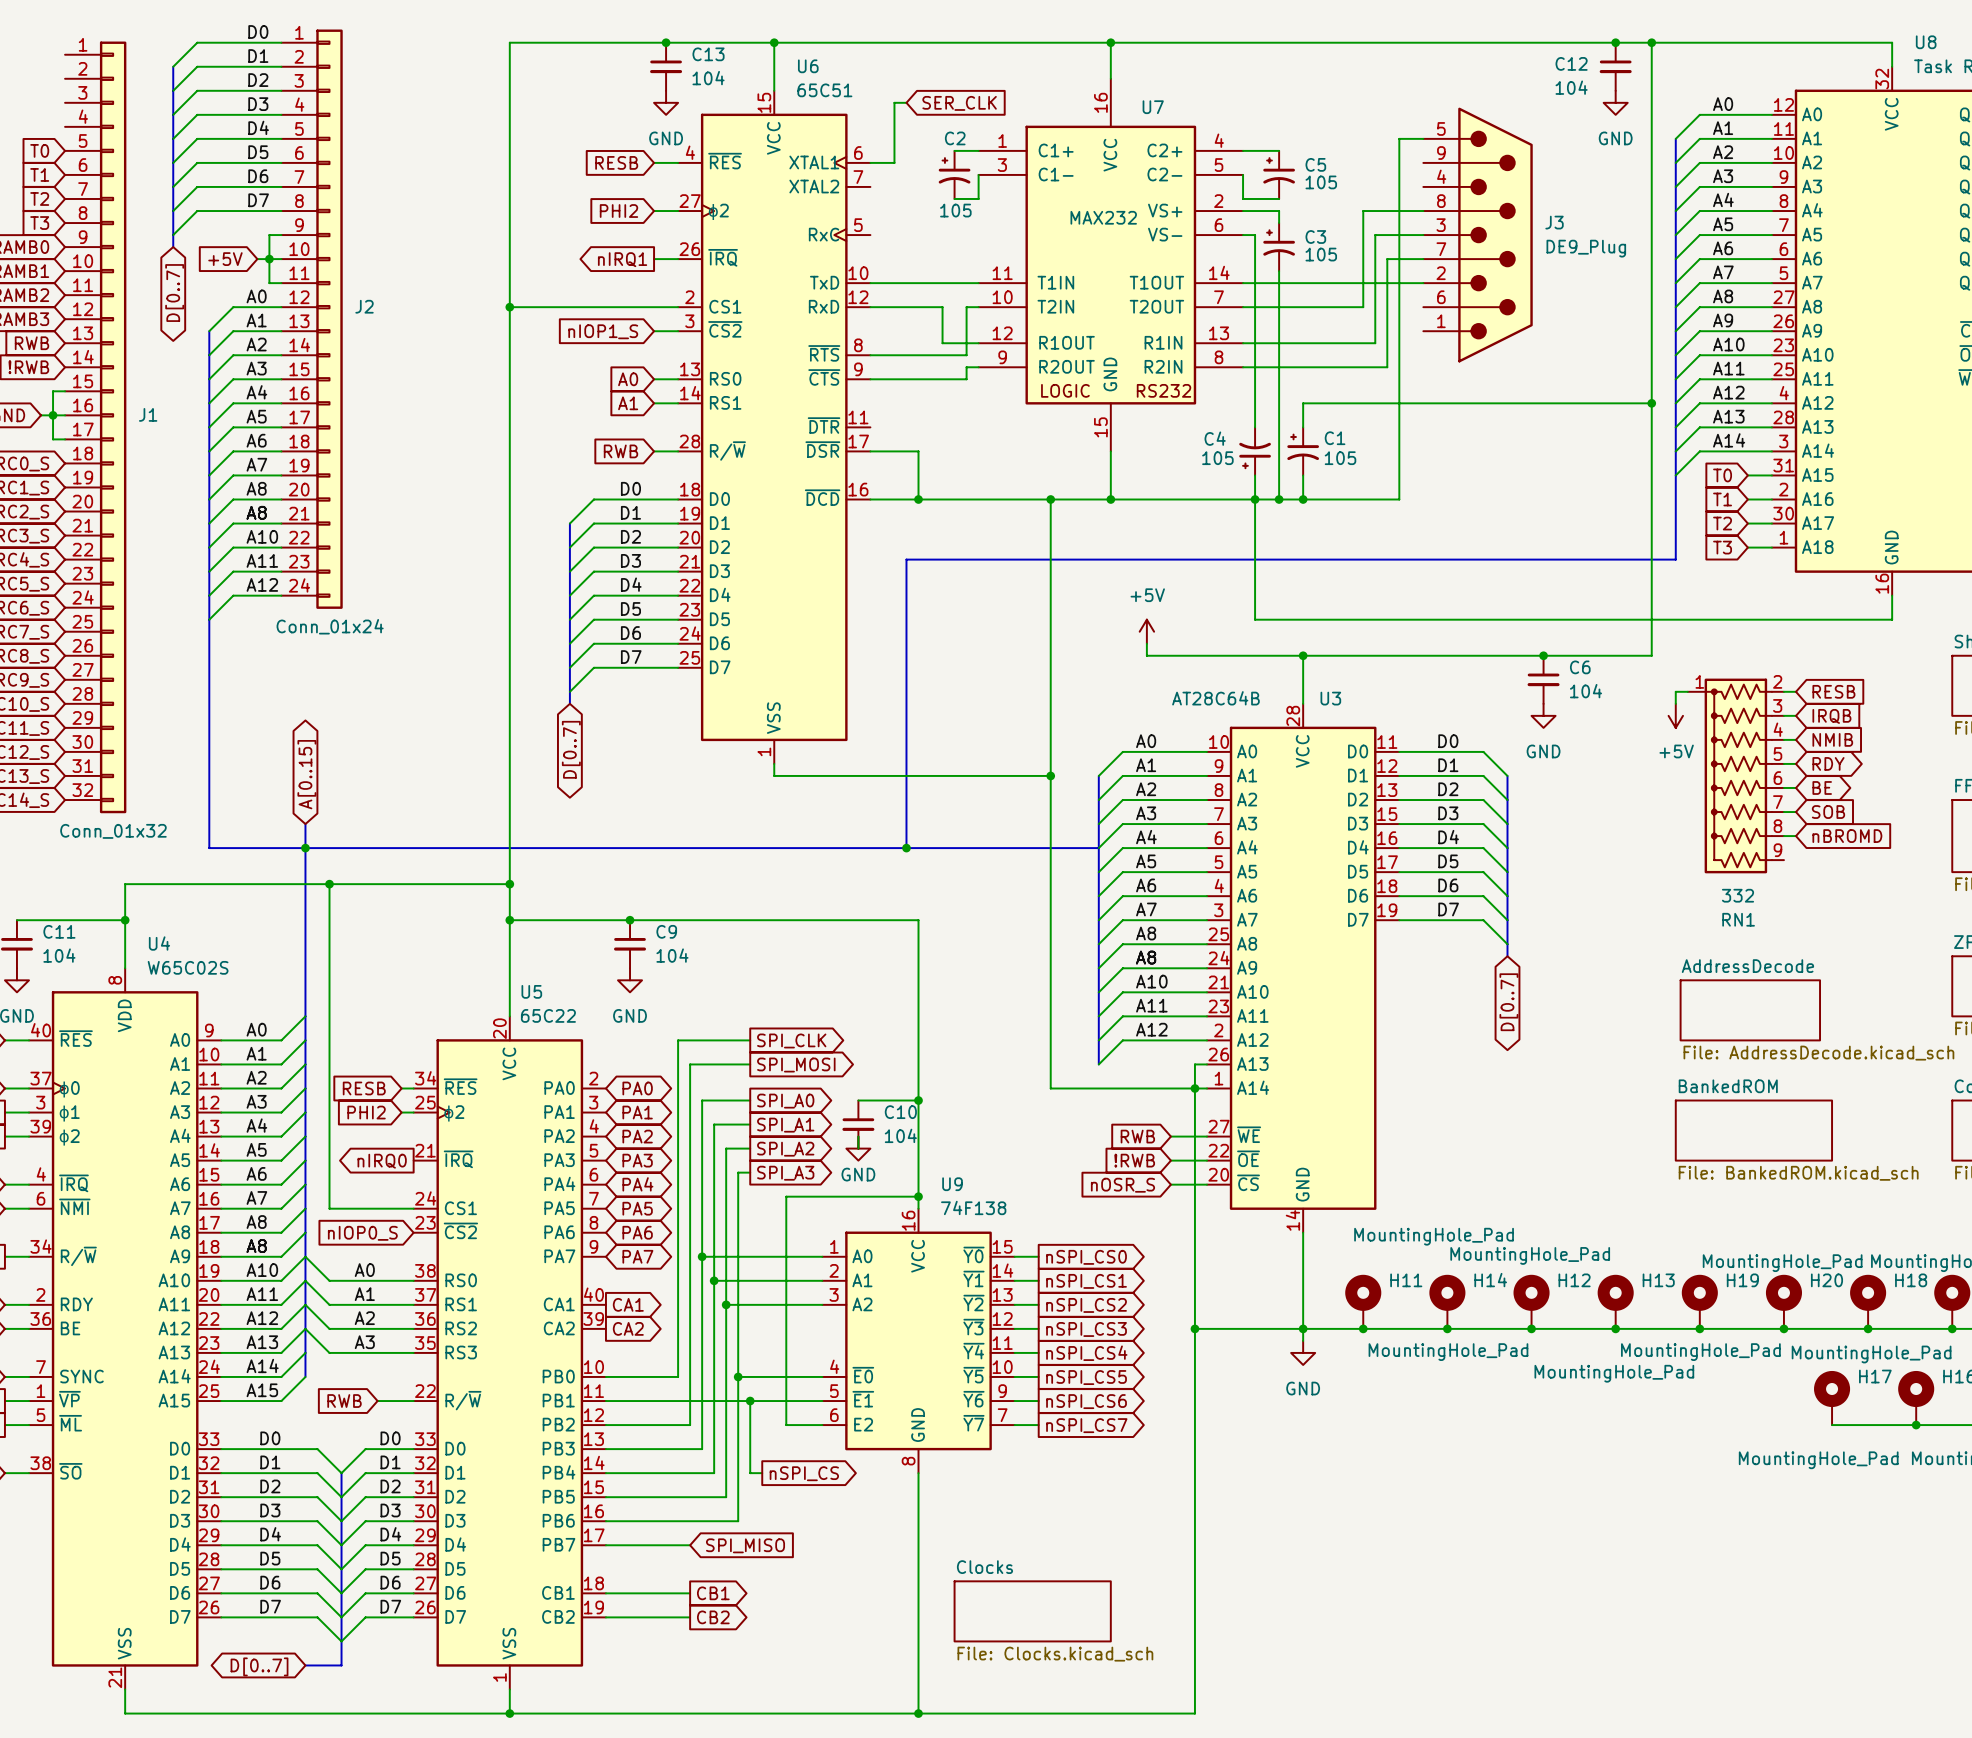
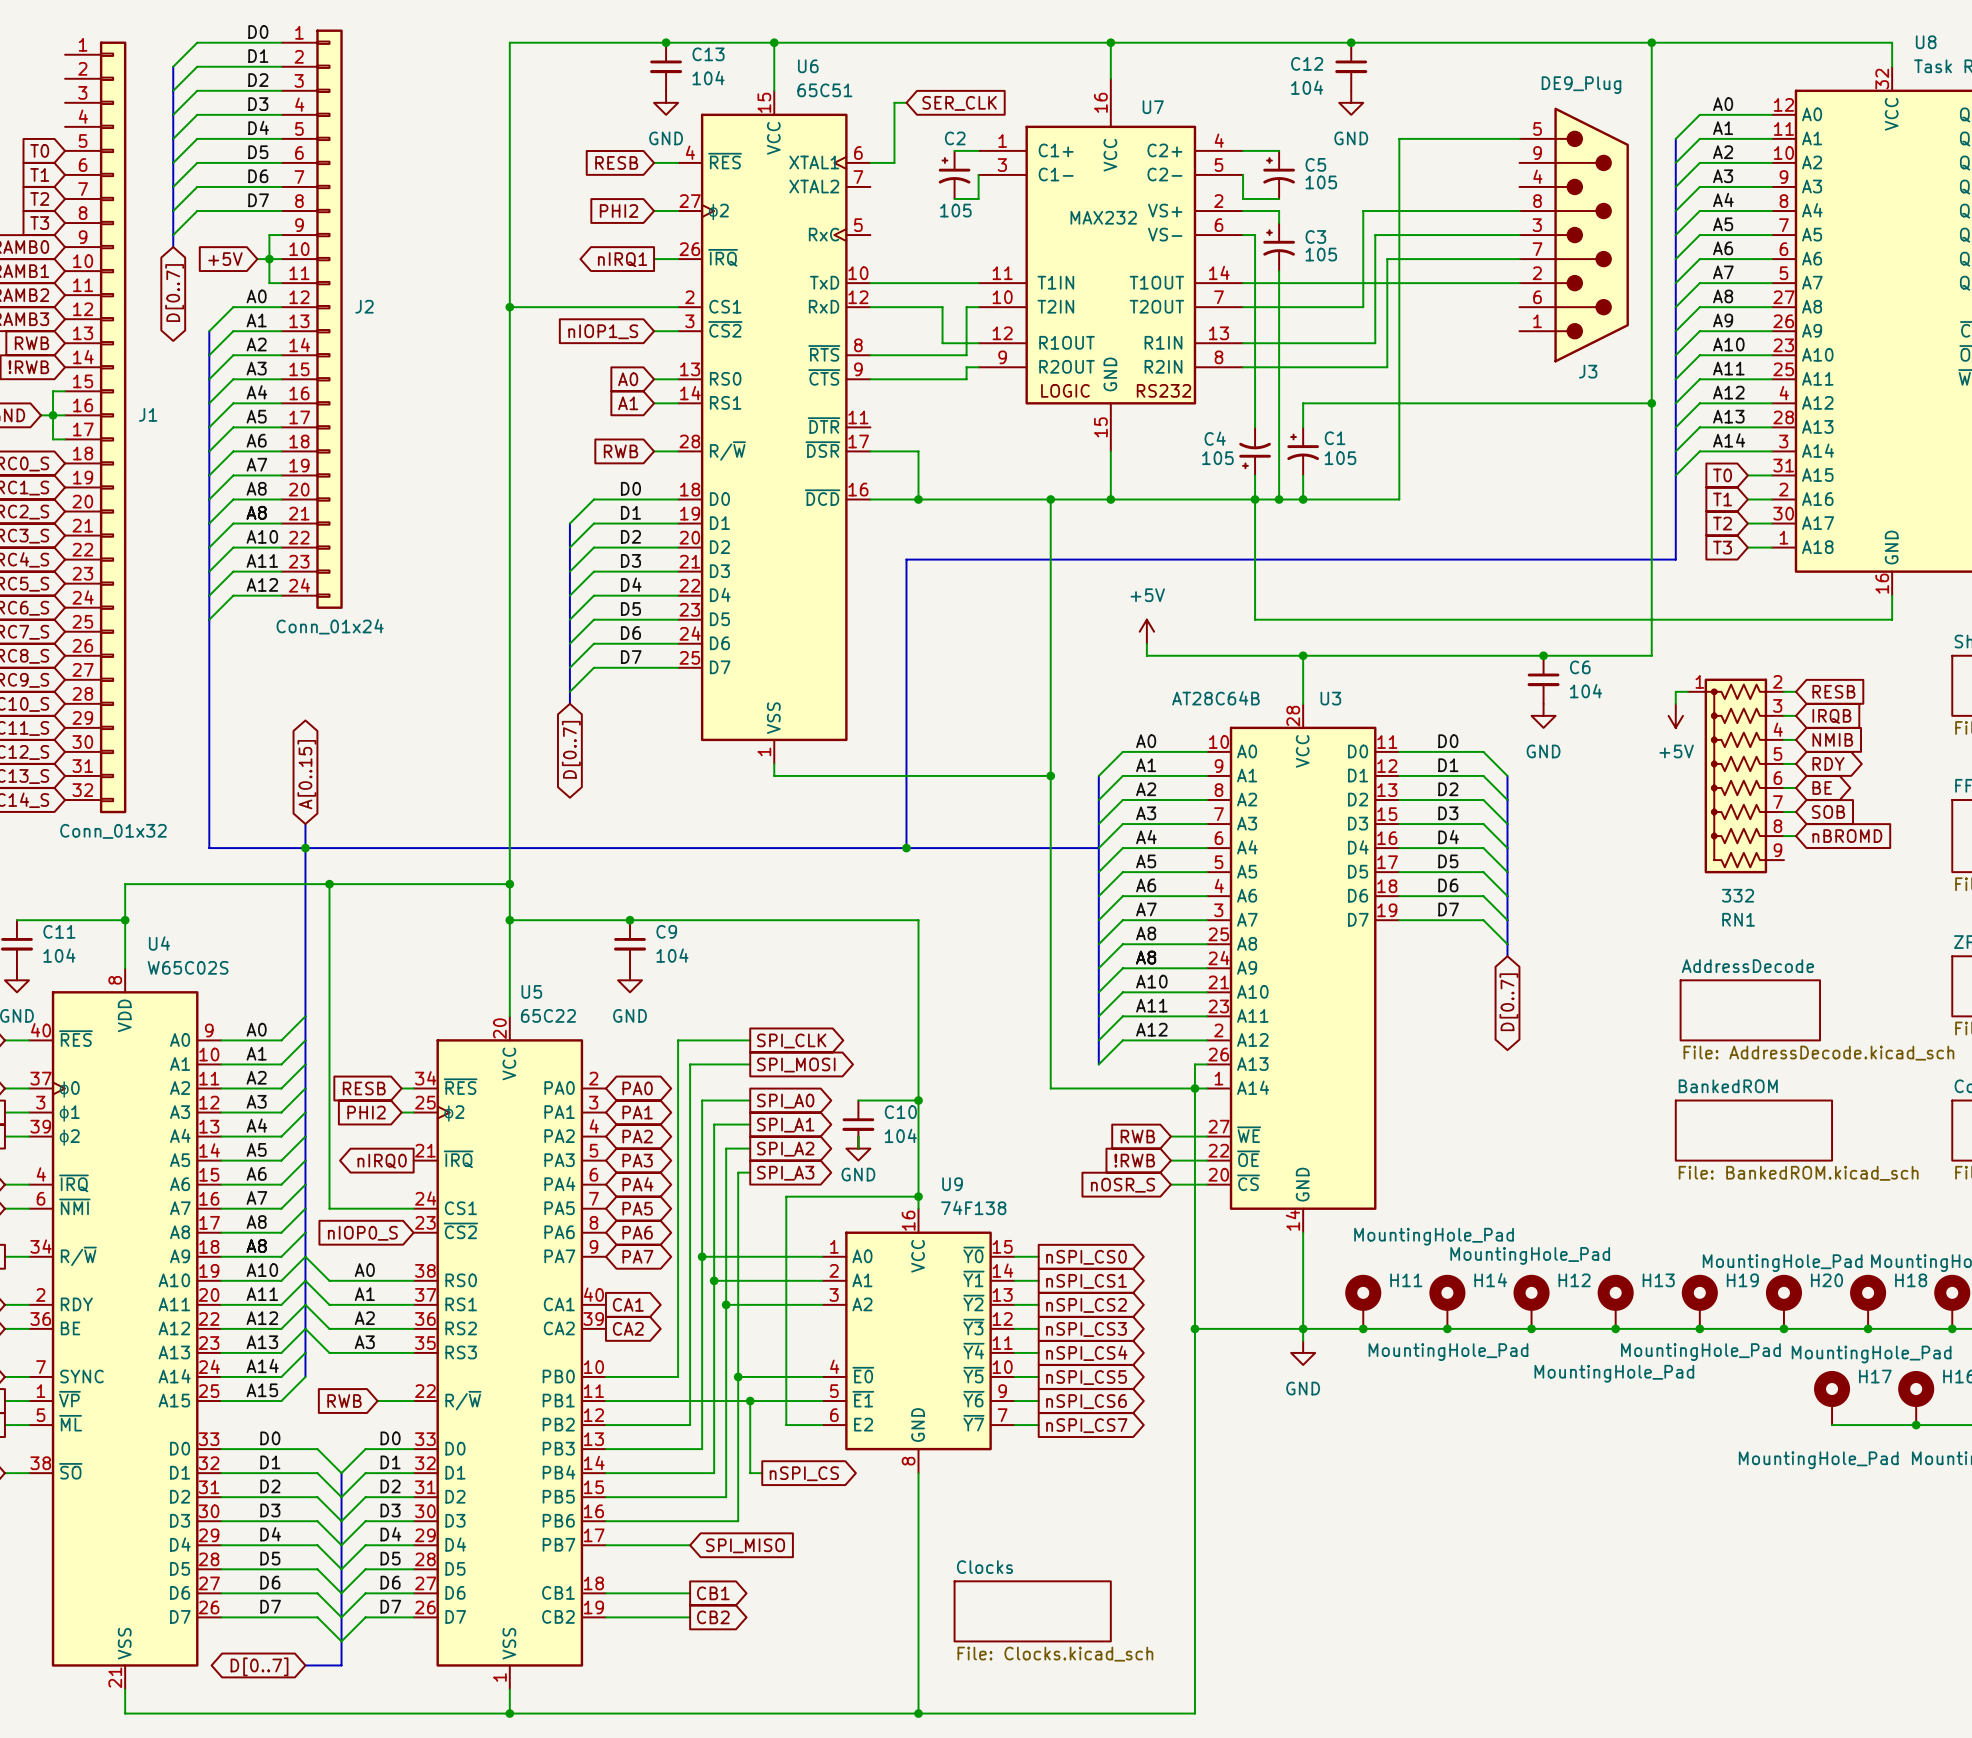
junction: none -> (1351, 42)
junction: (1615, 42) -> none
C12 position: (1615, 66) -> (1351, 66)
power symbol: none -> GND (1351, 102)
power symbol: GND (1615, 102) -> none
J3 name position: J3 (1554, 222) -> J3 (1588, 371)
J3 position: (1478, 235) -> (1574, 235)
J3 value position: DE9_Plug (1586, 248) -> DE9_Plug (1581, 85)

